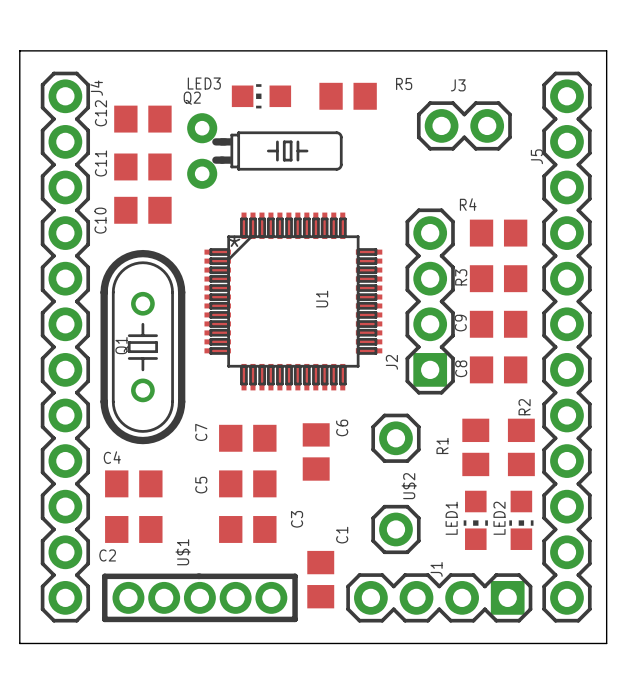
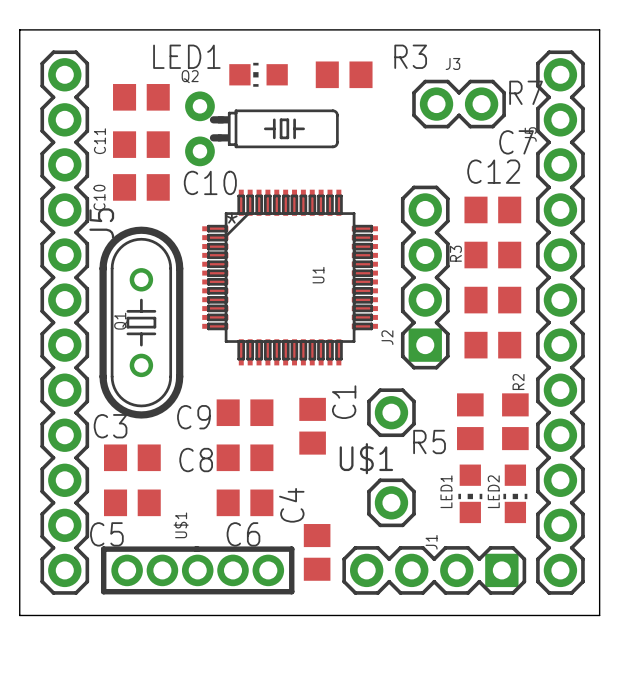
LED3 name: LED3 (204, 83) -> LED1 (186, 56)
R5 name: R5 (404, 83) -> R3 (410, 56)
J4 name: J4 (96, 88) -> J5 (101, 223)
C12 name: C12 (100, 113) -> C10 (210, 182)
R4 name: R4 (468, 204) -> R7 (526, 92)
C9 name: C9 (460, 323) -> C12 (493, 171)
C8 name: C8 (461, 368) -> C7 (516, 142)
C6 name: C6 (342, 427) -> C1 (344, 402)
C7 name: C7 (201, 432) -> C9 (193, 417)
R1 name: R1 (442, 445) -> R5 (429, 442)
C4 name: C4 (112, 457) -> C3 (110, 426)
C5 name: C5 (201, 485) -> C8 (196, 460)
U$2 name: U$2 (409, 486) -> U$1 (366, 458)
C3 name: C3 (297, 519) -> C6 (243, 534)
C1 name: C1 (342, 535) -> C4 (291, 505)
C2 name: C2 (107, 555) -> C5 (106, 534)

